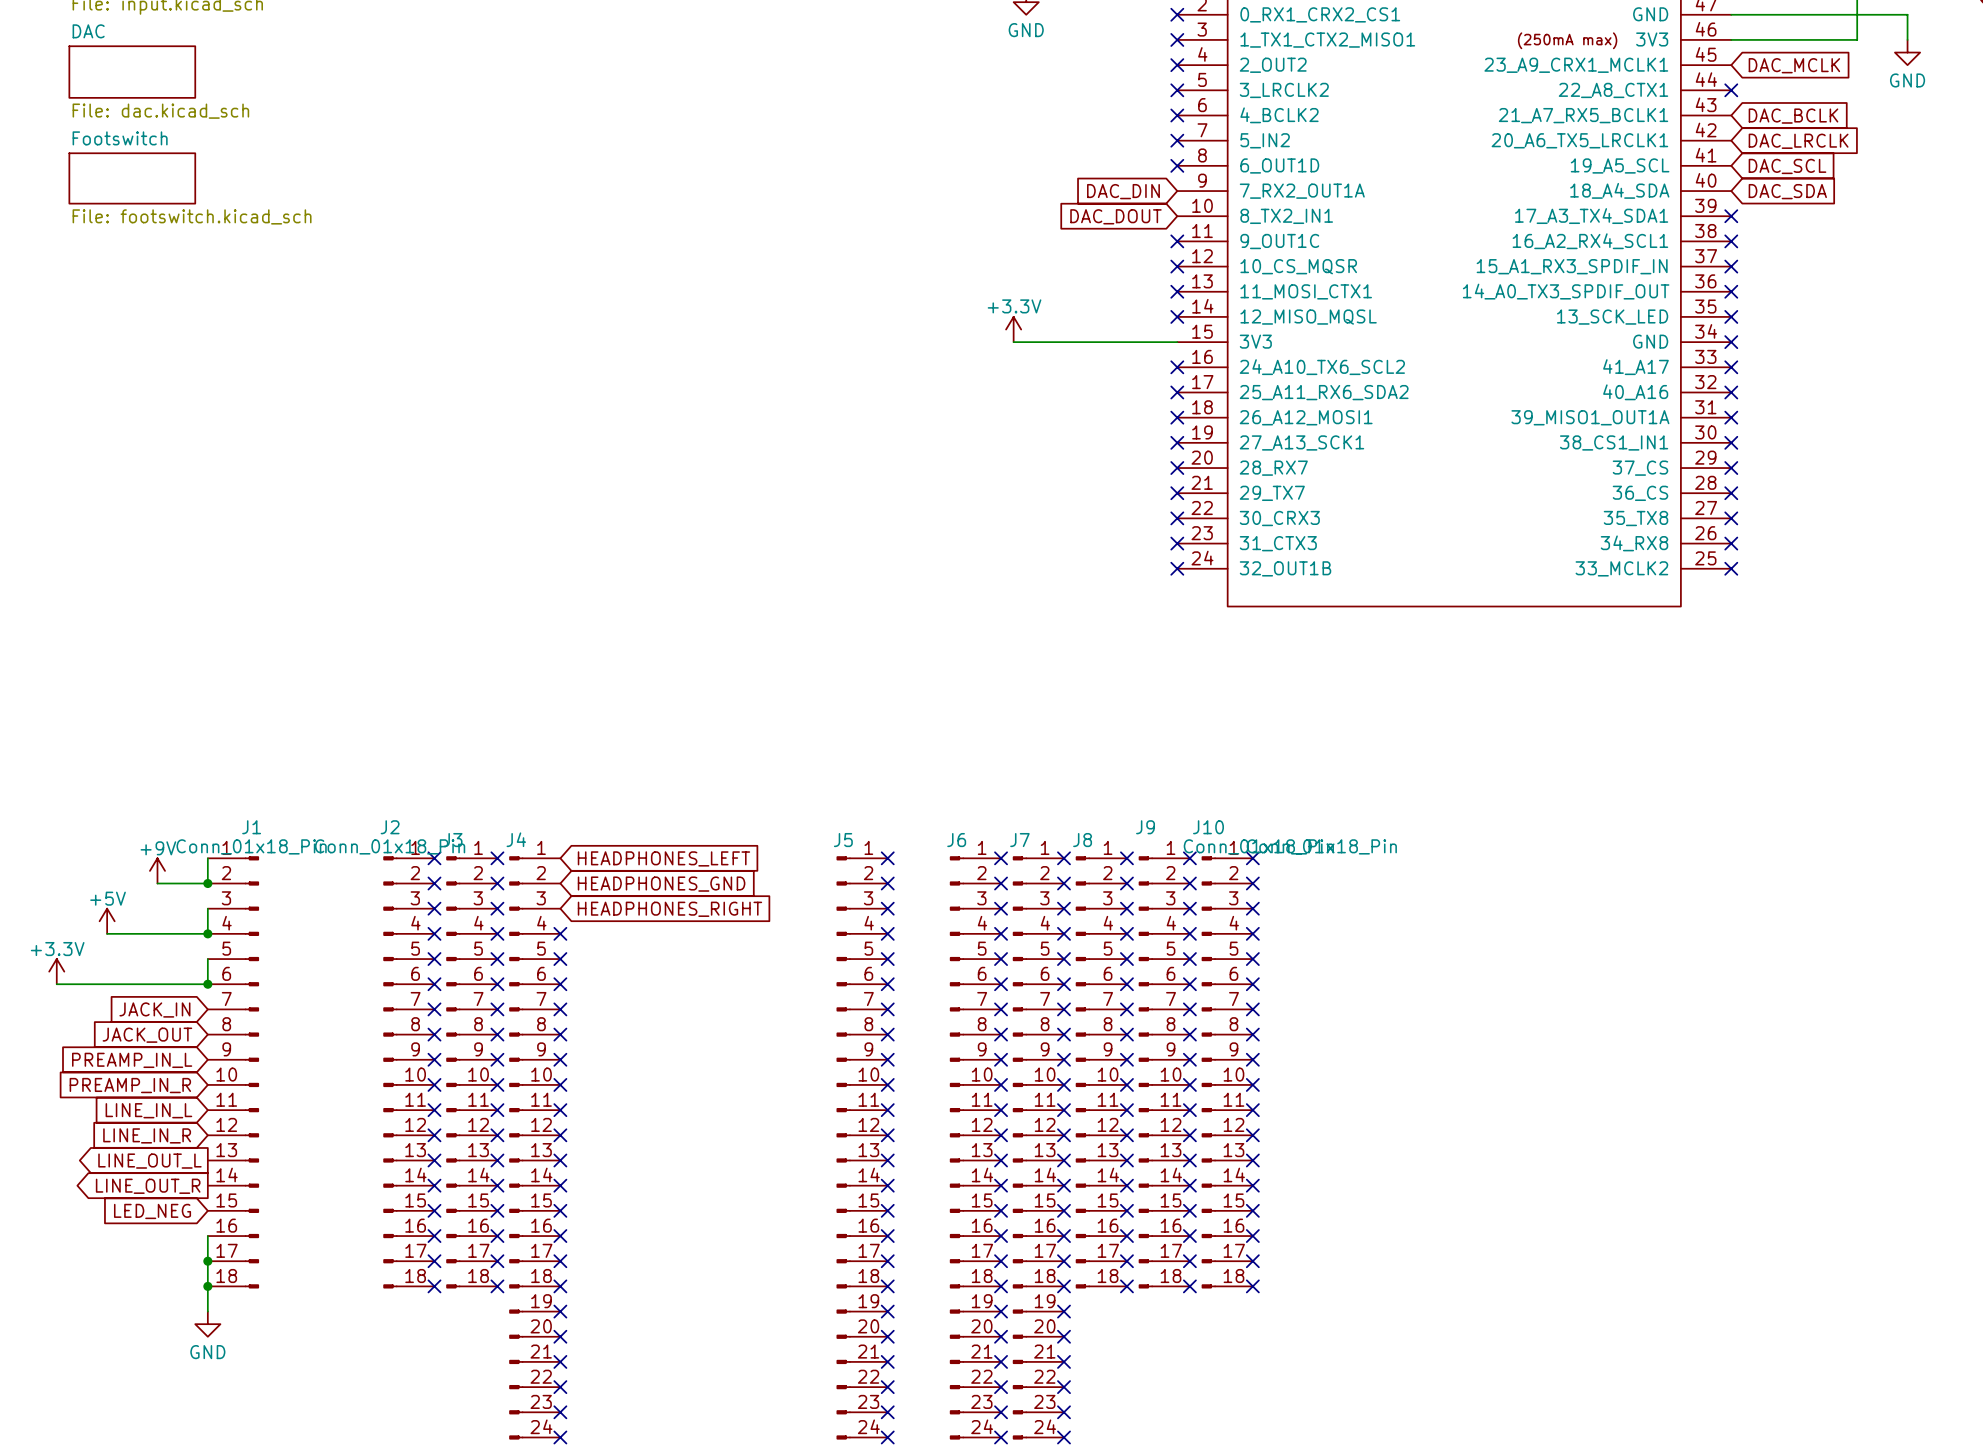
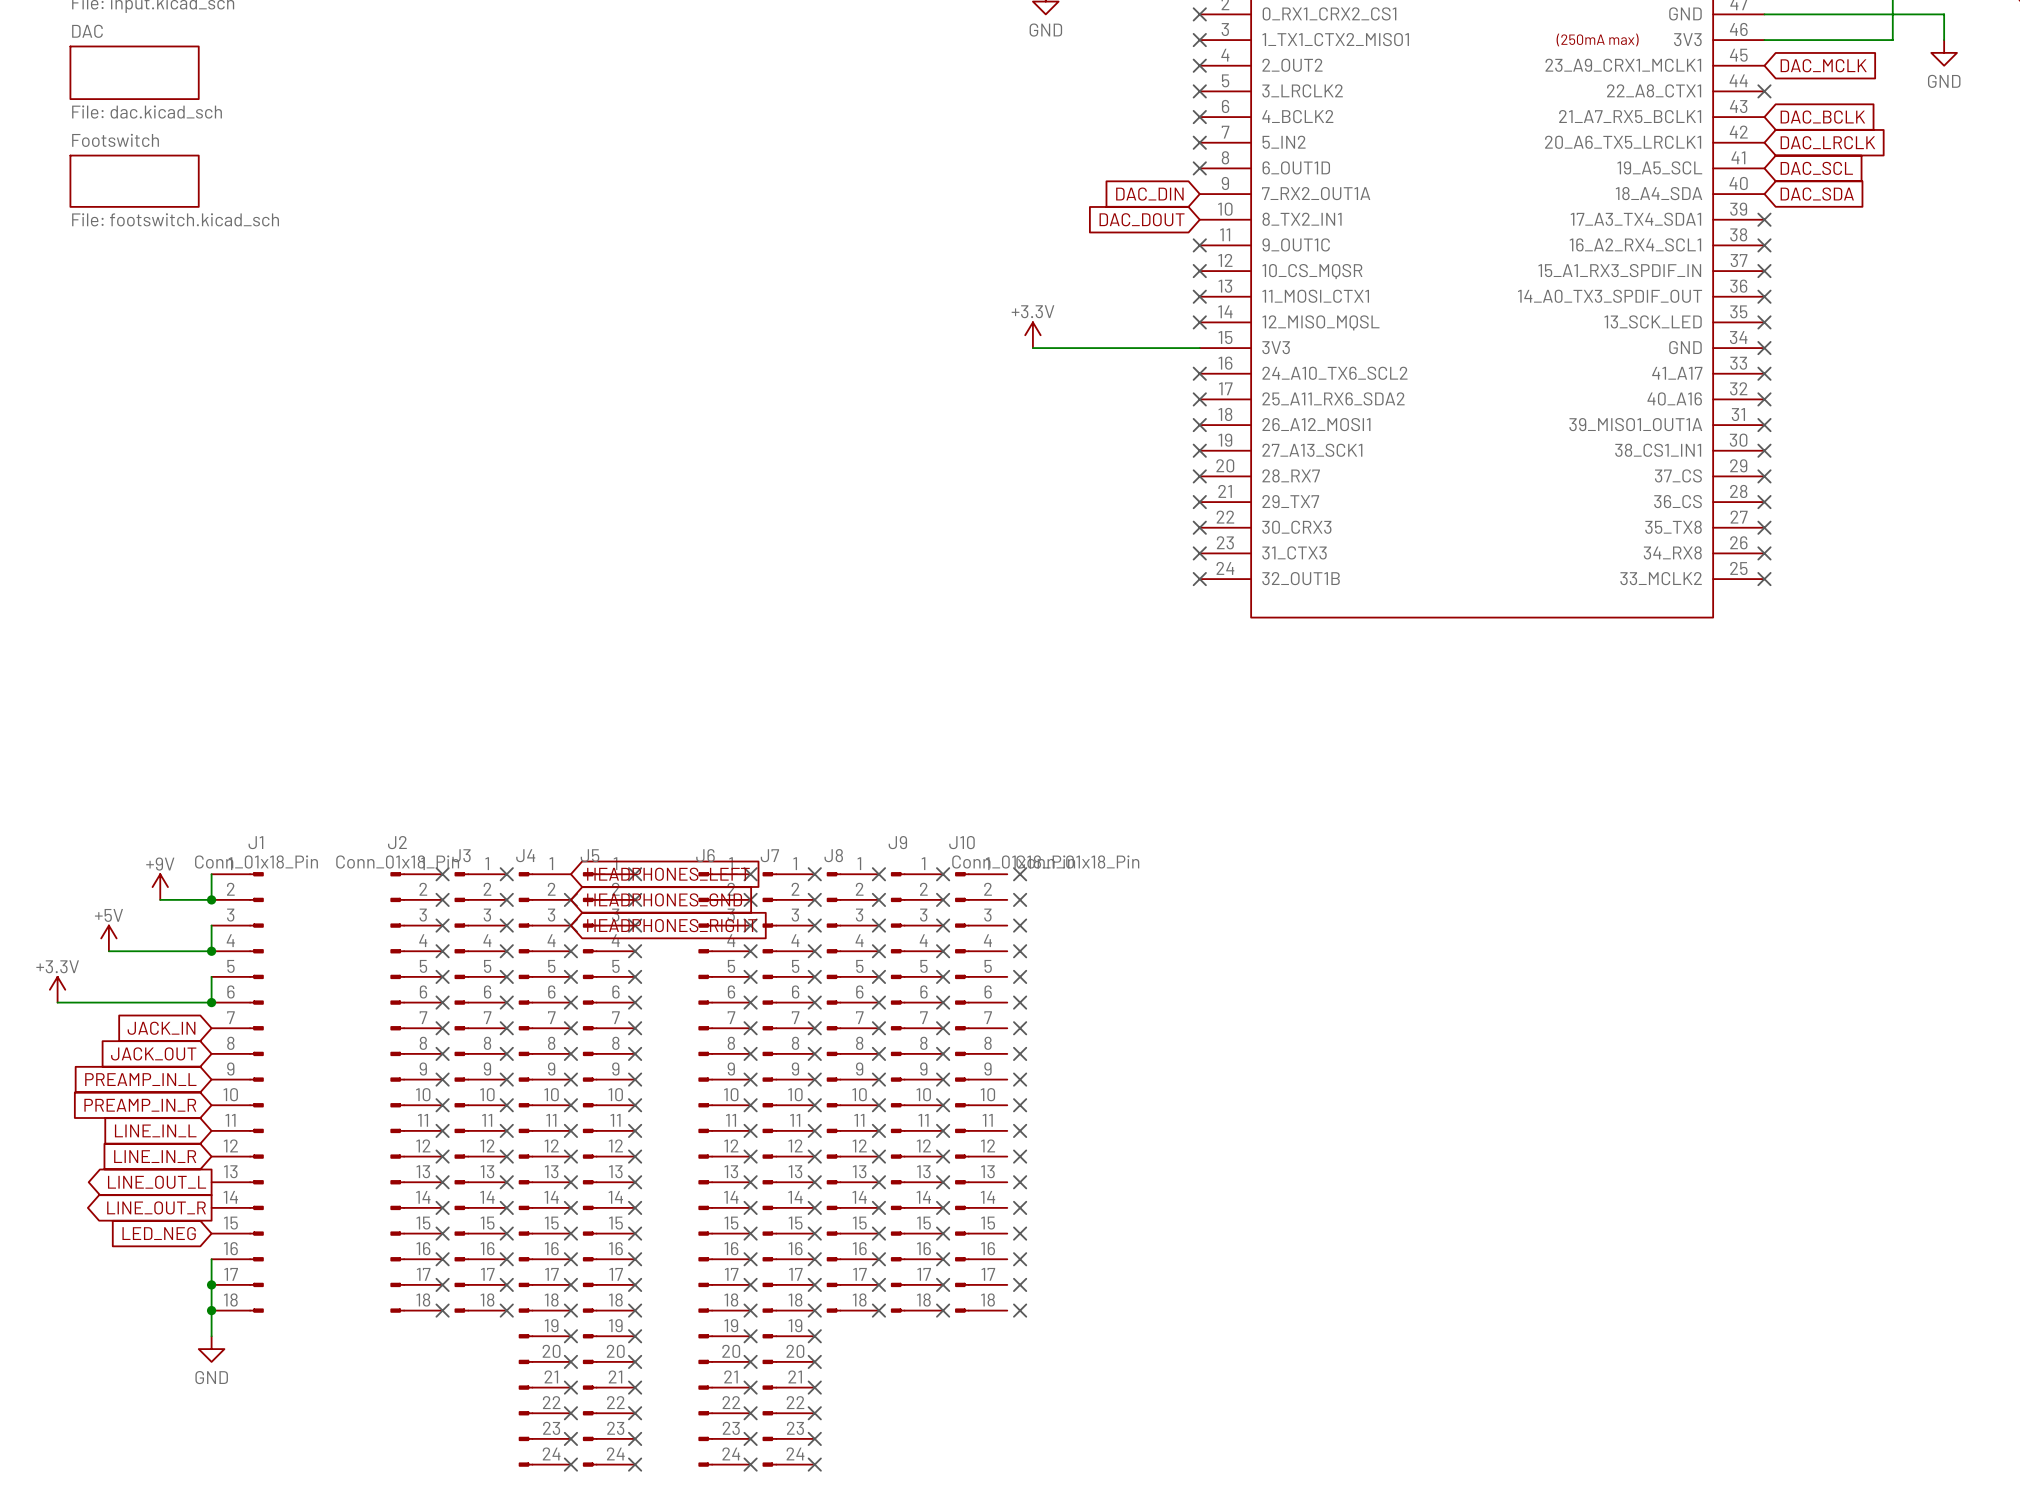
no-connect mark: none -> (635, 874)
no-connect mark: none -> (750, 874)
no-connect mark: none -> (814, 874)
no-connect mark: none -> (878, 874)
no-connect mark: (887, 858) -> none
no-connect mark: none -> (943, 874)
no-connect mark: (1063, 858) -> none
no-connect mark: (1126, 858) -> none
no-connect mark: (1189, 858) -> none
no-connect mark: (1252, 858) -> none
no-connect mark: none -> (570, 899)
no-connect mark: none -> (635, 899)
no-connect mark: none -> (750, 899)
no-connect mark: none -> (814, 899)
no-connect mark: none -> (878, 899)
no-connect mark: (887, 883) -> none
no-connect mark: none -> (943, 899)
no-connect mark: (1063, 883) -> none
no-connect mark: (1126, 883) -> none
no-connect mark: (1189, 883) -> none
no-connect mark: (1252, 883) -> none
no-connect mark: none -> (570, 925)
no-connect mark: none -> (635, 925)
no-connect mark: none -> (750, 925)
no-connect mark: none -> (814, 925)
no-connect mark: none -> (878, 925)
no-connect mark: (887, 908) -> none
no-connect mark: none -> (943, 925)
no-connect mark: (1063, 908) -> none
no-connect mark: (1126, 908) -> none
no-connect mark: (1189, 908) -> none
no-connect mark: (1252, 908) -> none
no-connect mark: none -> (635, 951)
no-connect mark: none -> (750, 951)
no-connect mark: none -> (814, 951)
no-connect mark: none -> (878, 951)
no-connect mark: (887, 933) -> none
no-connect mark: none -> (943, 951)
no-connect mark: (1063, 933) -> none
no-connect mark: (1126, 933) -> none
no-connect mark: (1189, 933) -> none
no-connect mark: (1252, 933) -> none
no-connect mark: none -> (635, 976)
no-connect mark: none -> (750, 976)
no-connect mark: none -> (814, 976)
no-connect mark: none -> (878, 976)
no-connect mark: (887, 959) -> none
no-connect mark: none -> (943, 976)
no-connect mark: (1063, 959) -> none
no-connect mark: (1126, 959) -> none
no-connect mark: (1189, 959) -> none
no-connect mark: (1252, 959) -> none
no-connect mark: none -> (635, 1002)
no-connect mark: none -> (750, 1002)
no-connect mark: none -> (814, 1002)
no-connect mark: none -> (878, 1002)
no-connect mark: (887, 984) -> none
no-connect mark: none -> (943, 1002)
no-connect mark: (1063, 984) -> none
no-connect mark: (1126, 984) -> none
no-connect mark: (1189, 984) -> none
no-connect mark: (1252, 984) -> none
no-connect mark: none -> (635, 1028)
no-connect mark: none -> (750, 1028)
no-connect mark: none -> (814, 1028)
no-connect mark: none -> (878, 1028)
no-connect mark: (887, 1009) -> none
no-connect mark: none -> (943, 1028)
no-connect mark: (1063, 1009) -> none
no-connect mark: (1126, 1009) -> none
no-connect mark: (1189, 1009) -> none
no-connect mark: (1252, 1009) -> none
no-connect mark: none -> (635, 1053)
no-connect mark: none -> (750, 1053)
no-connect mark: none -> (814, 1053)
no-connect mark: none -> (878, 1053)
no-connect mark: (887, 1034) -> none
no-connect mark: none -> (943, 1053)
no-connect mark: (1063, 1034) -> none
no-connect mark: (1126, 1034) -> none
no-connect mark: (1189, 1034) -> none
no-connect mark: (1252, 1034) -> none
no-connect mark: none -> (635, 1079)
no-connect mark: none -> (750, 1079)
no-connect mark: none -> (814, 1079)
no-connect mark: none -> (878, 1079)
no-connect mark: (887, 1059) -> none
no-connect mark: none -> (943, 1079)
no-connect mark: (1063, 1059) -> none
no-connect mark: (1126, 1059) -> none
no-connect mark: (1189, 1059) -> none
no-connect mark: (1252, 1059) -> none
J8 position: (1101, 1072) -> (852, 1092)
J9 position: (1164, 1072) -> (917, 1092)
J10 position: (1227, 1072) -> (981, 1092)
no-connect mark: none -> (635, 1105)
no-connect mark: none -> (750, 1105)
no-connect mark: none -> (814, 1105)
no-connect mark: none -> (878, 1105)
no-connect mark: (887, 1084) -> none
no-connect mark: none -> (943, 1105)
no-connect mark: (1063, 1084) -> none
no-connect mark: (1126, 1084) -> none
no-connect mark: (1189, 1084) -> none
no-connect mark: (1252, 1084) -> none
no-connect mark: none -> (635, 1130)
no-connect mark: none -> (750, 1130)
no-connect mark: none -> (814, 1130)
no-connect mark: none -> (878, 1130)
no-connect mark: (887, 1110) -> none
no-connect mark: none -> (943, 1130)
no-connect mark: (1063, 1110) -> none
no-connect mark: (1126, 1110) -> none
no-connect mark: (1189, 1110) -> none
no-connect mark: (1252, 1110) -> none
no-connect mark: none -> (635, 1156)
no-connect mark: none -> (750, 1156)
no-connect mark: none -> (814, 1156)
no-connect mark: none -> (878, 1156)
no-connect mark: (887, 1135) -> none
no-connect mark: none -> (943, 1156)
no-connect mark: (1063, 1135) -> none
no-connect mark: (1126, 1135) -> none
no-connect mark: (1189, 1135) -> none
no-connect mark: (1252, 1135) -> none
J5 position: (862, 1147) -> (609, 1169)
J6 position: (975, 1147) -> (724, 1169)
J7 position: (1038, 1147) -> (788, 1169)
no-connect mark: none -> (635, 1182)
no-connect mark: none -> (750, 1182)
no-connect mark: none -> (814, 1182)
no-connect mark: none -> (878, 1182)
no-connect mark: (887, 1160) -> none
no-connect mark: none -> (943, 1182)
no-connect mark: (1063, 1160) -> none
no-connect mark: (1126, 1160) -> none
no-connect mark: (1189, 1160) -> none
no-connect mark: (1252, 1160) -> none
no-connect mark: none -> (635, 1207)
no-connect mark: none -> (750, 1207)
no-connect mark: none -> (814, 1207)
no-connect mark: none -> (878, 1207)
no-connect mark: (887, 1185) -> none
no-connect mark: none -> (943, 1207)
no-connect mark: (1063, 1185) -> none
no-connect mark: (1126, 1185) -> none
no-connect mark: (1189, 1185) -> none
no-connect mark: (1252, 1185) -> none
no-connect mark: none -> (635, 1233)
no-connect mark: none -> (750, 1233)
no-connect mark: none -> (814, 1233)
no-connect mark: none -> (878, 1233)
no-connect mark: (887, 1210) -> none
no-connect mark: none -> (943, 1233)
no-connect mark: (1063, 1210) -> none
no-connect mark: (1126, 1210) -> none
no-connect mark: (1189, 1210) -> none
no-connect mark: (1252, 1210) -> none
no-connect mark: none -> (635, 1259)
no-connect mark: none -> (750, 1259)
no-connect mark: none -> (814, 1259)
no-connect mark: none -> (878, 1259)
no-connect mark: (887, 1236) -> none
no-connect mark: none -> (943, 1259)
no-connect mark: (1063, 1236) -> none
no-connect mark: (1126, 1236) -> none
no-connect mark: (1189, 1236) -> none
no-connect mark: (1252, 1236) -> none
no-connect mark: none -> (635, 1284)
no-connect mark: none -> (750, 1284)
no-connect mark: none -> (814, 1284)
no-connect mark: none -> (878, 1284)
no-connect mark: (887, 1261) -> none
no-connect mark: none -> (943, 1284)
no-connect mark: (1063, 1261) -> none
no-connect mark: (1126, 1261) -> none
no-connect mark: (1189, 1261) -> none
no-connect mark: (1252, 1261) -> none
no-connect mark: none -> (635, 1310)
no-connect mark: none -> (750, 1310)
no-connect mark: none -> (814, 1310)
no-connect mark: none -> (878, 1310)
no-connect mark: (887, 1286) -> none
no-connect mark: none -> (943, 1310)
no-connect mark: (1063, 1286) -> none
no-connect mark: (1126, 1286) -> none
no-connect mark: (1189, 1286) -> none
no-connect mark: (1252, 1286) -> none
no-connect mark: none -> (635, 1336)
no-connect mark: none -> (750, 1336)
no-connect mark: none -> (814, 1336)
no-connect mark: (887, 1311) -> none
no-connect mark: (1001, 1311) -> none
no-connect mark: (1063, 1311) -> none
no-connect mark: none -> (635, 1361)
no-connect mark: none -> (750, 1361)
no-connect mark: none -> (814, 1361)
no-connect mark: (887, 1336) -> none
no-connect mark: (1001, 1336) -> none
no-connect mark: (1063, 1336) -> none
no-connect mark: none -> (635, 1387)
no-connect mark: none -> (750, 1387)
no-connect mark: none -> (814, 1387)
no-connect mark: (887, 1361) -> none
no-connect mark: (1001, 1361) -> none
no-connect mark: (1063, 1361) -> none
no-connect mark: none -> (635, 1413)
no-connect mark: none -> (750, 1413)
no-connect mark: none -> (814, 1413)
no-connect mark: (887, 1387) -> none
no-connect mark: (1001, 1387) -> none
no-connect mark: (1063, 1387) -> none
no-connect mark: none -> (635, 1438)
no-connect mark: none -> (750, 1438)
no-connect mark: none -> (814, 1438)
no-connect mark: (887, 1412) -> none
no-connect mark: (1001, 1412) -> none
no-connect mark: (1063, 1412) -> none
no-connect mark: none -> (635, 1464)
no-connect mark: none -> (750, 1464)
no-connect mark: none -> (814, 1464)
no-connect mark: (887, 1437) -> none
no-connect mark: (1001, 1437) -> none
no-connect mark: (1063, 1437) -> none

